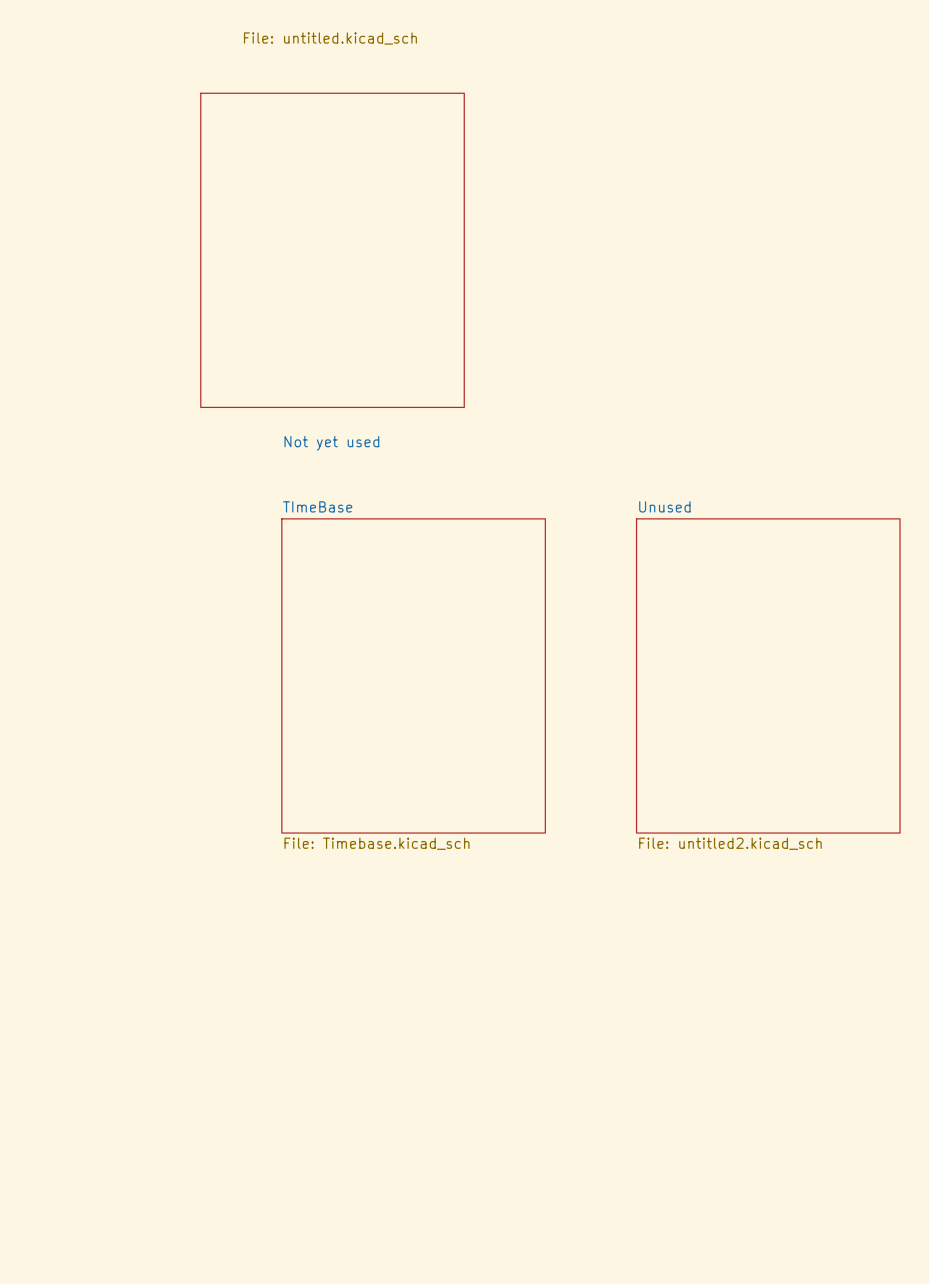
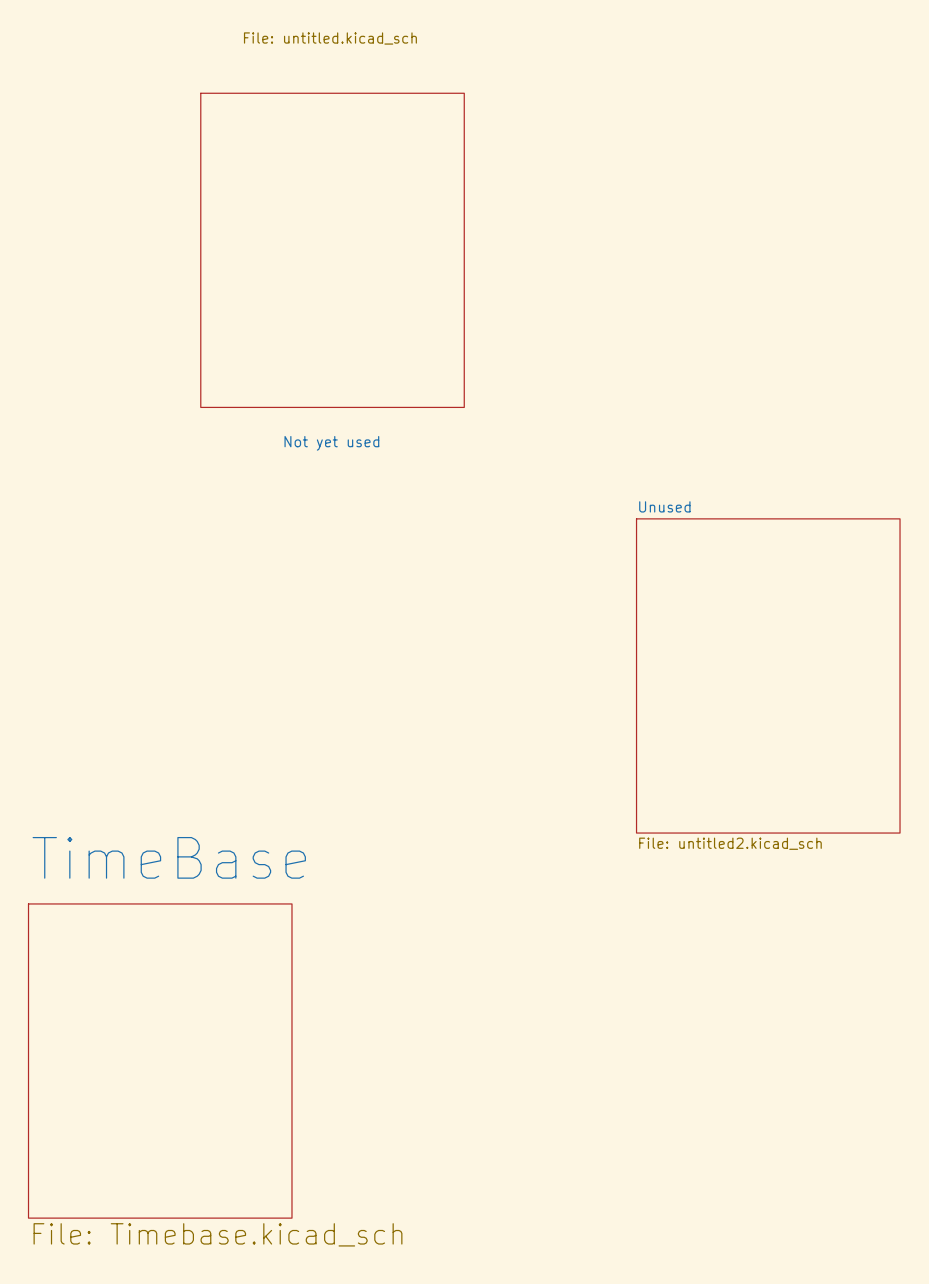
sheet TImeBase: File: Timebase.kicad_sch (413, 675) -> none
sheet TimeBase: none -> File: Timebase.kicad_sch (160, 1061)

